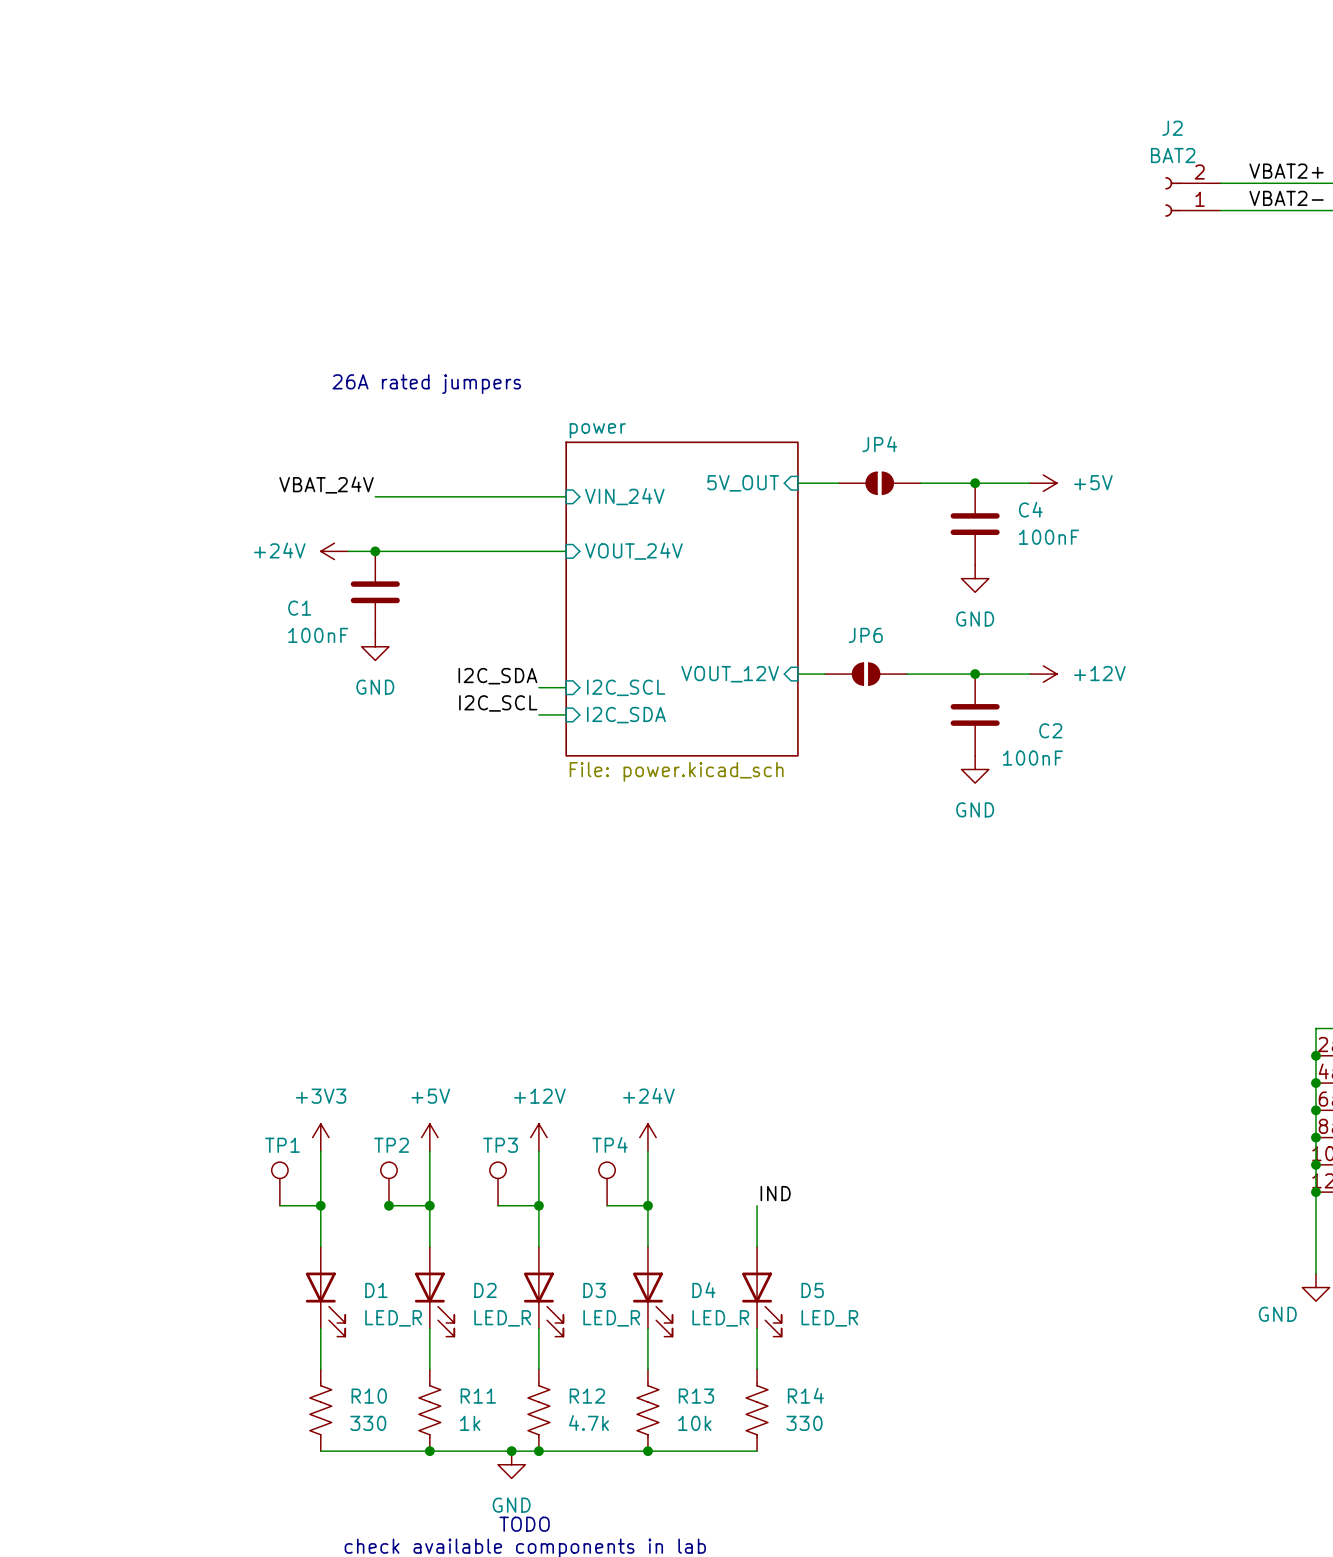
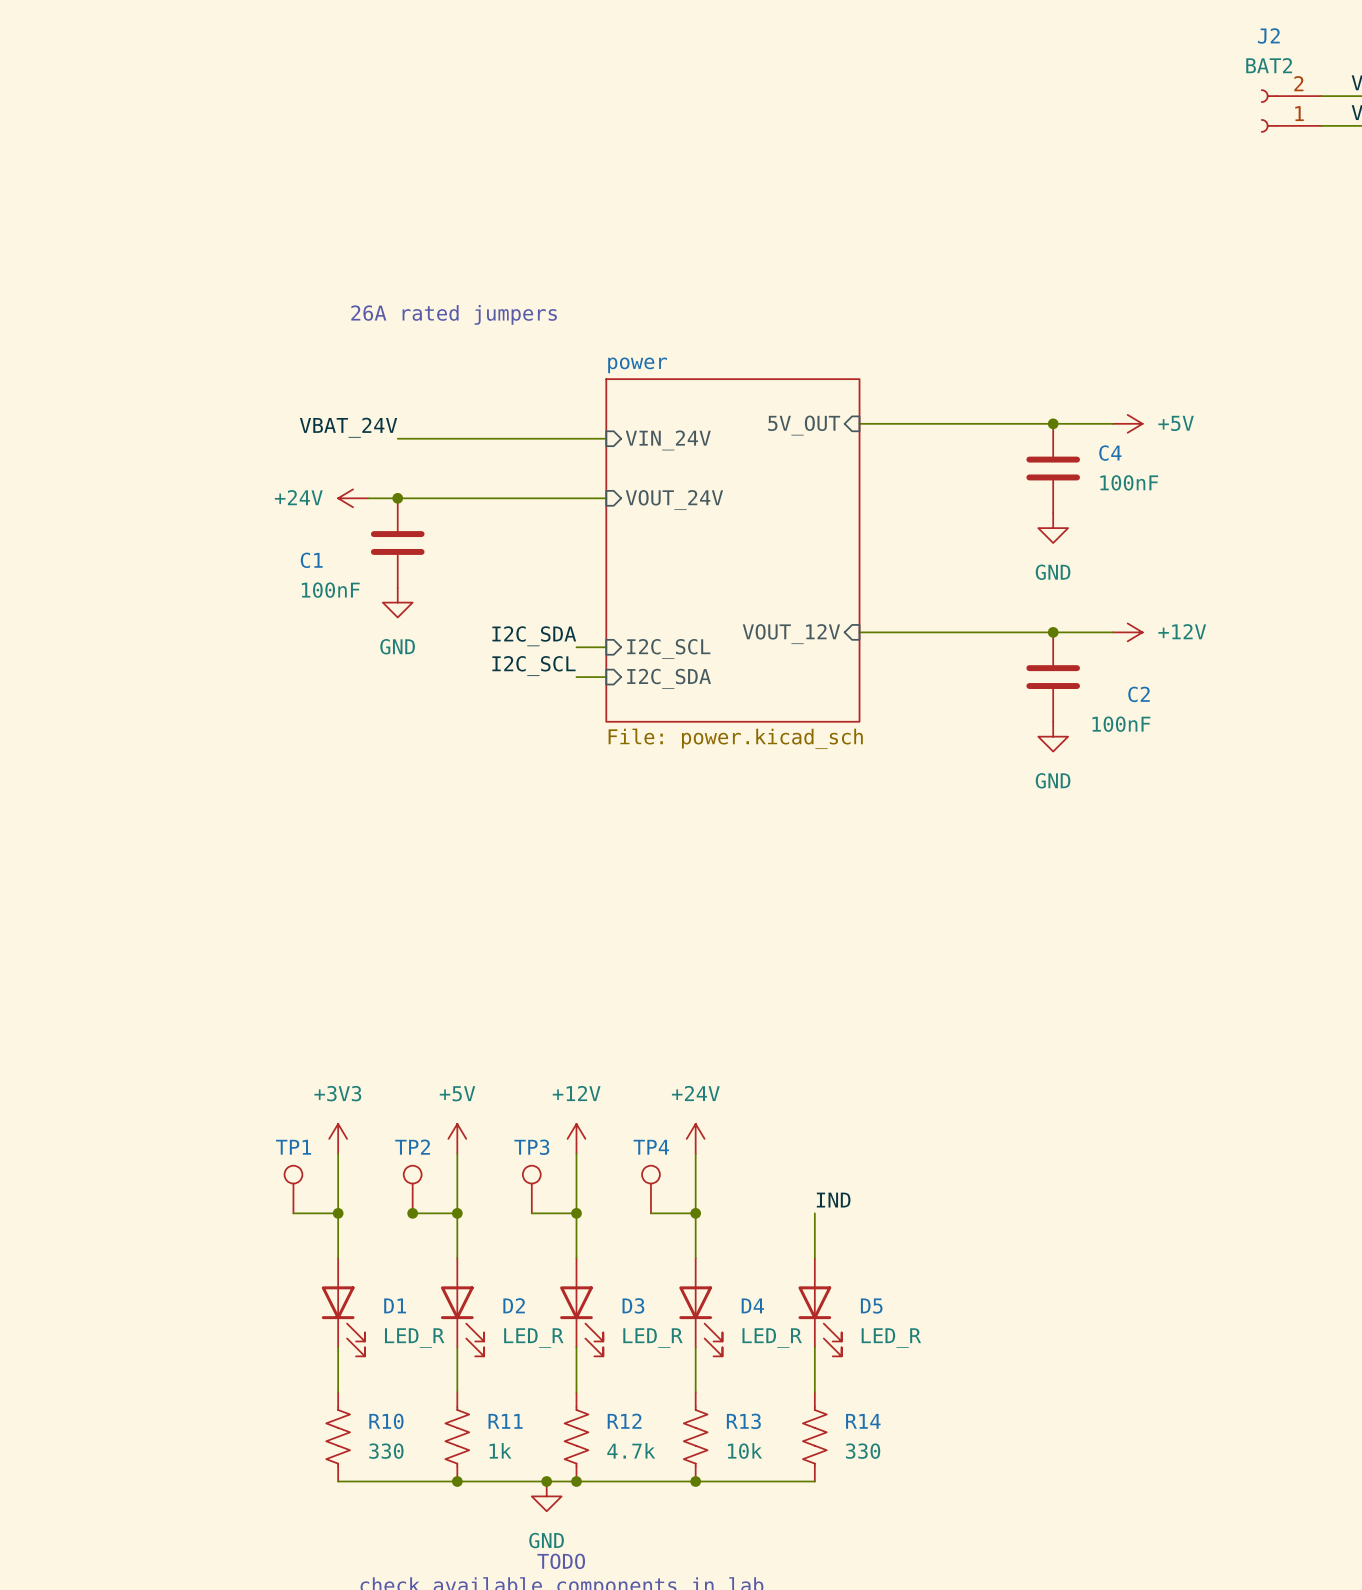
JP4: (879, 483) -> none
JP6: (866, 674) -> none

